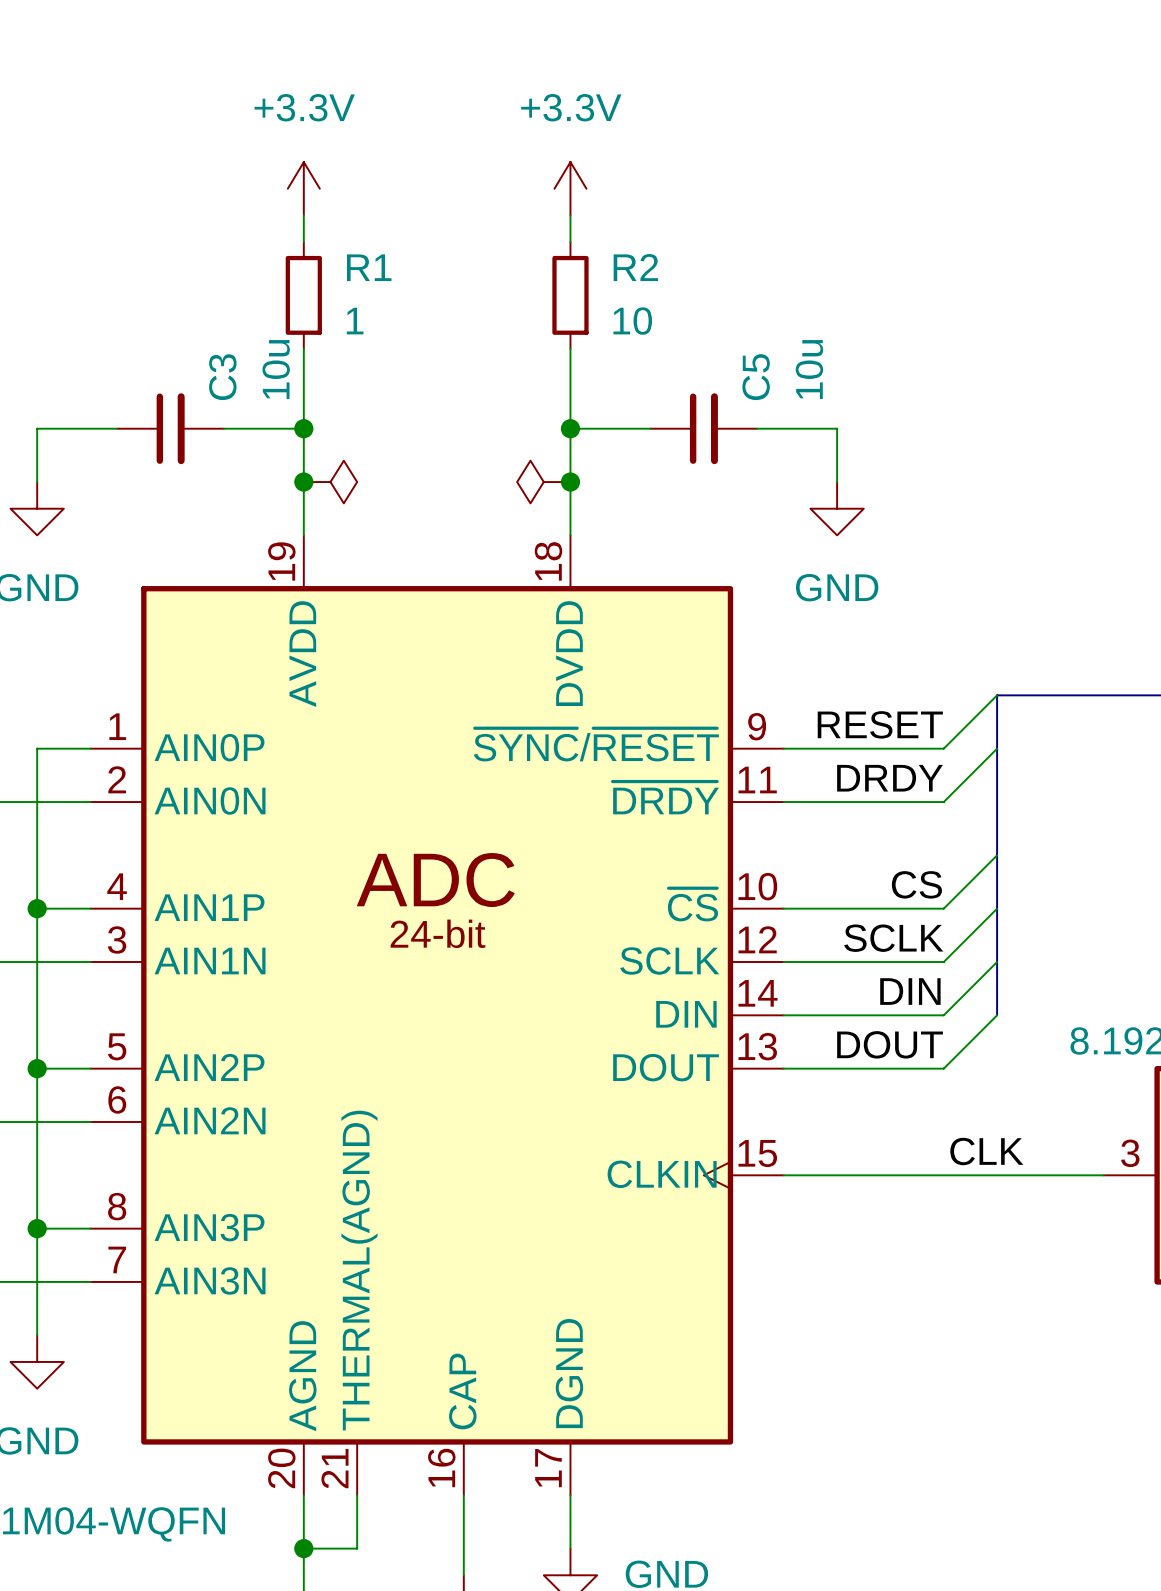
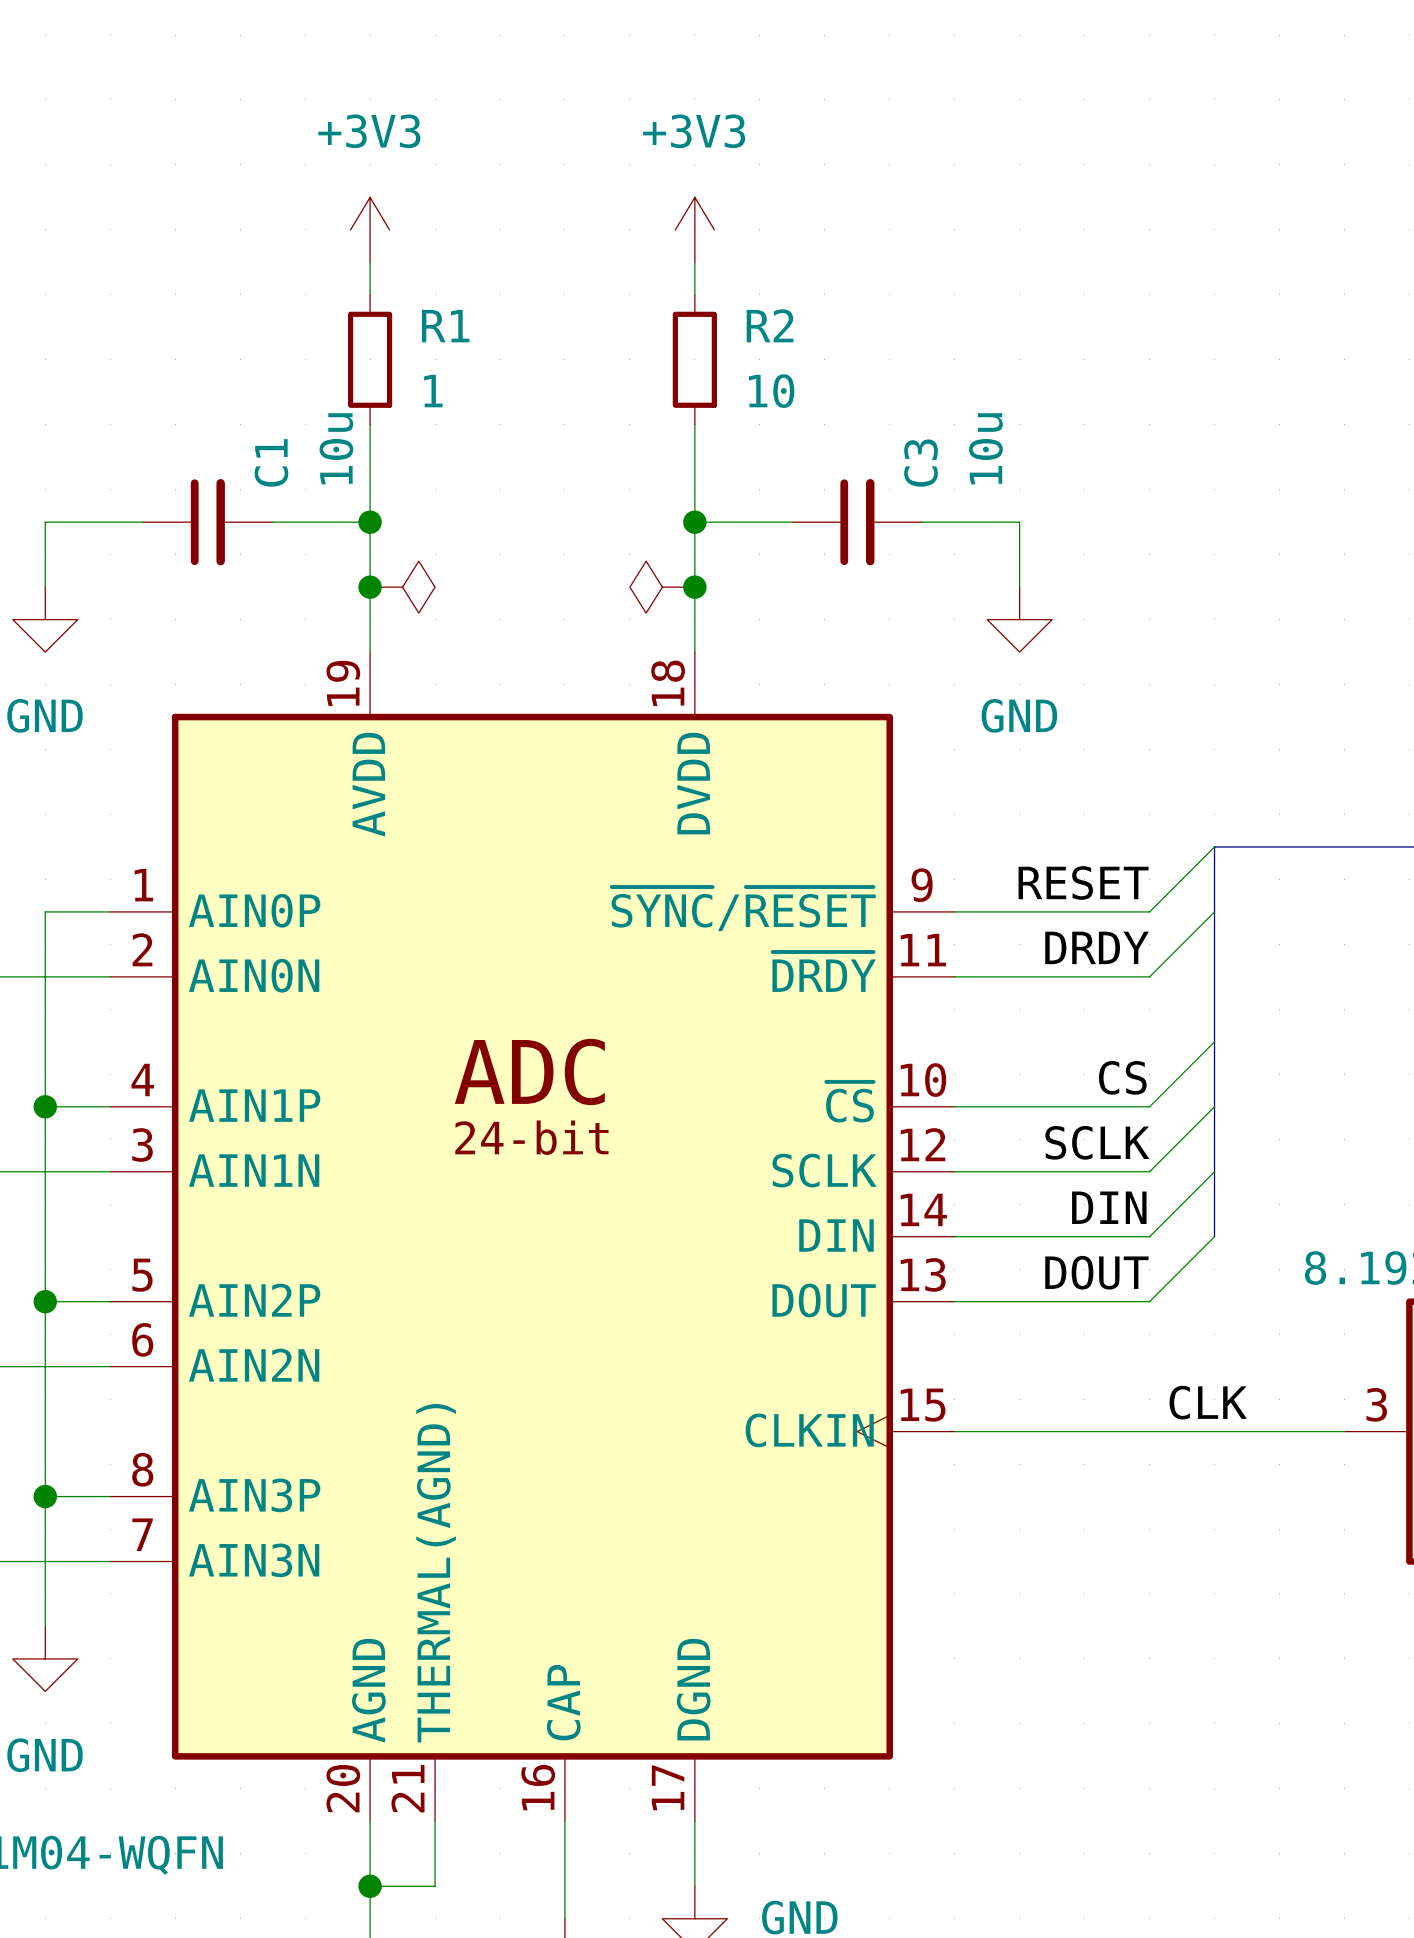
power symbol: +3.3V (303, 188) -> +3V3 (370, 229)
power symbol: +3.3V (570, 188) -> +3V3 (694, 229)
C3 name: C3 (222, 377) -> C1 (271, 462)
C5 name: C5 (756, 377) -> C3 (921, 463)

